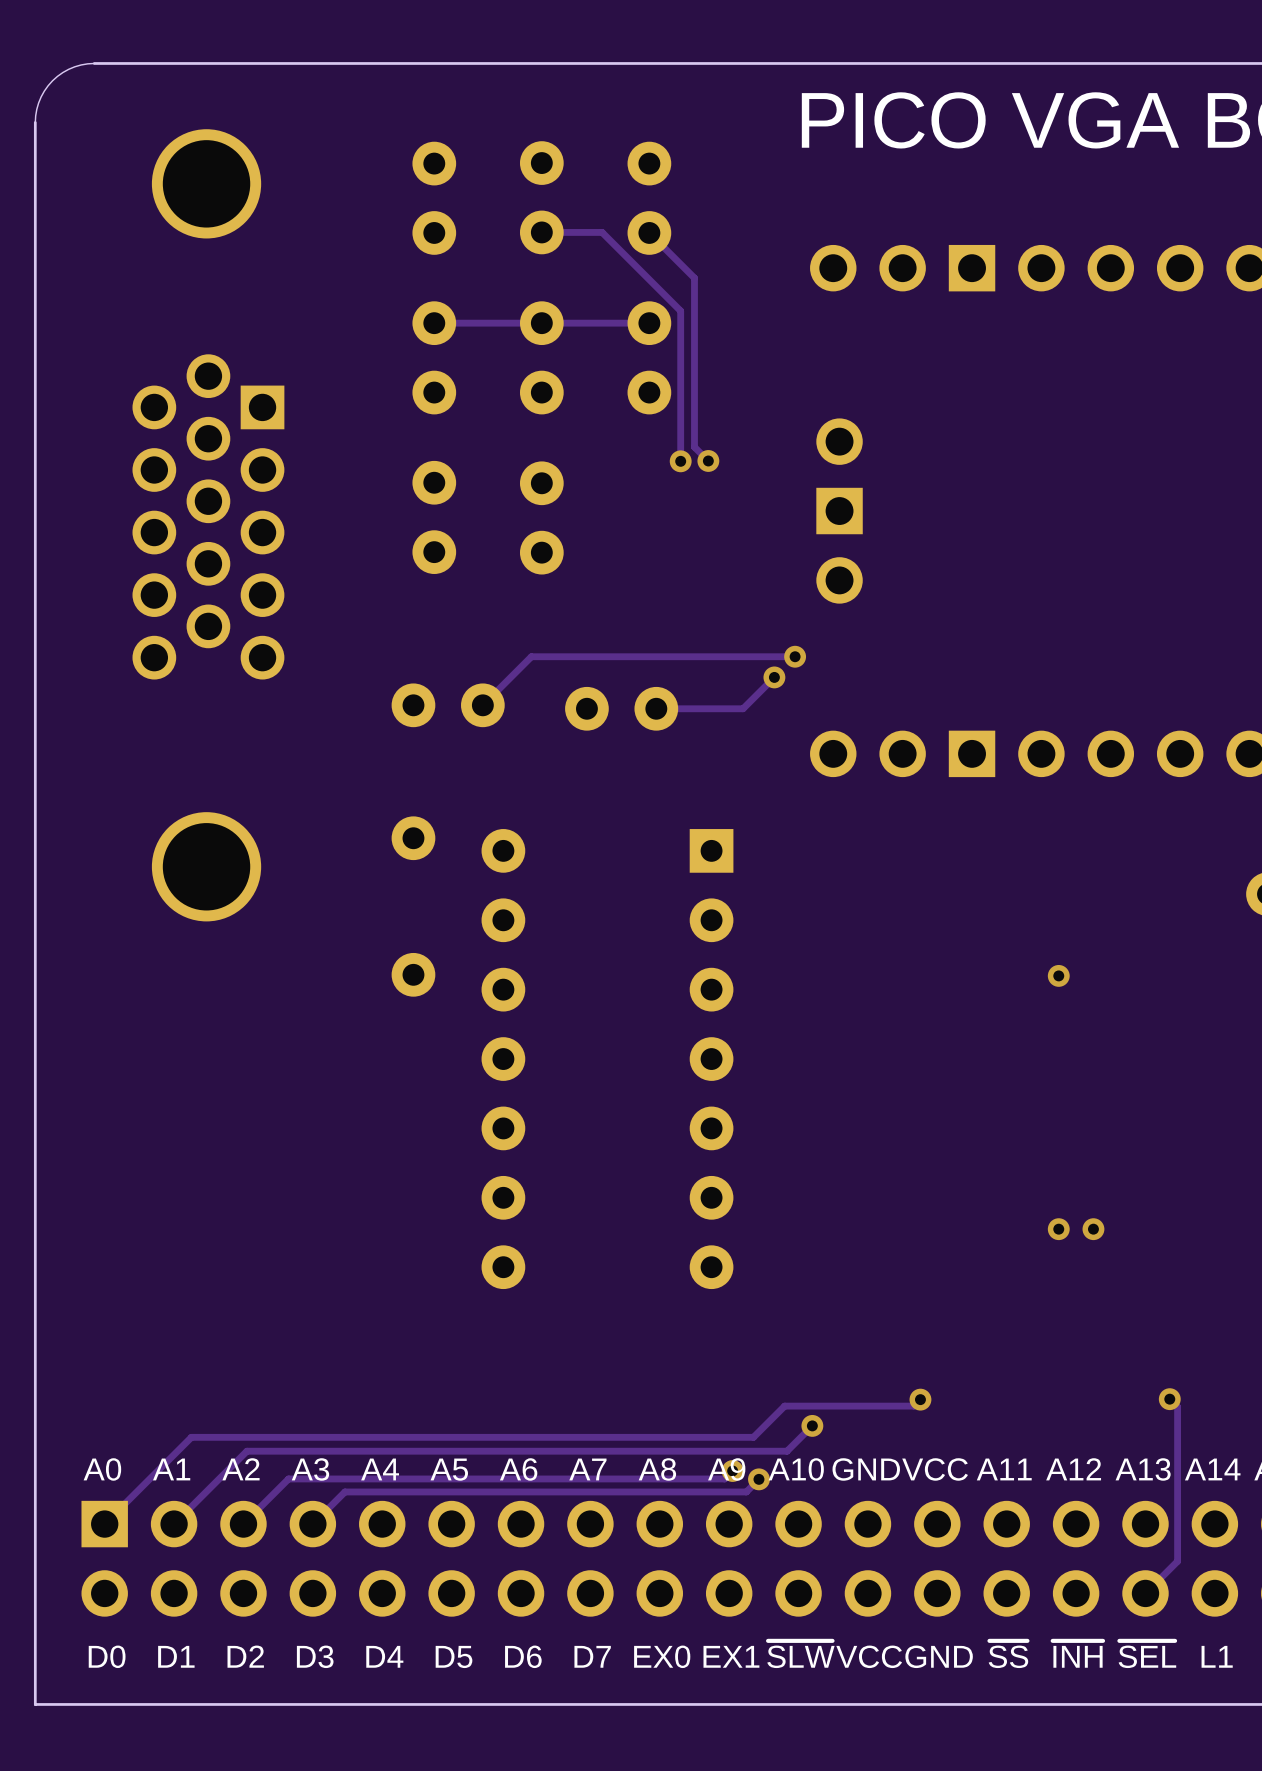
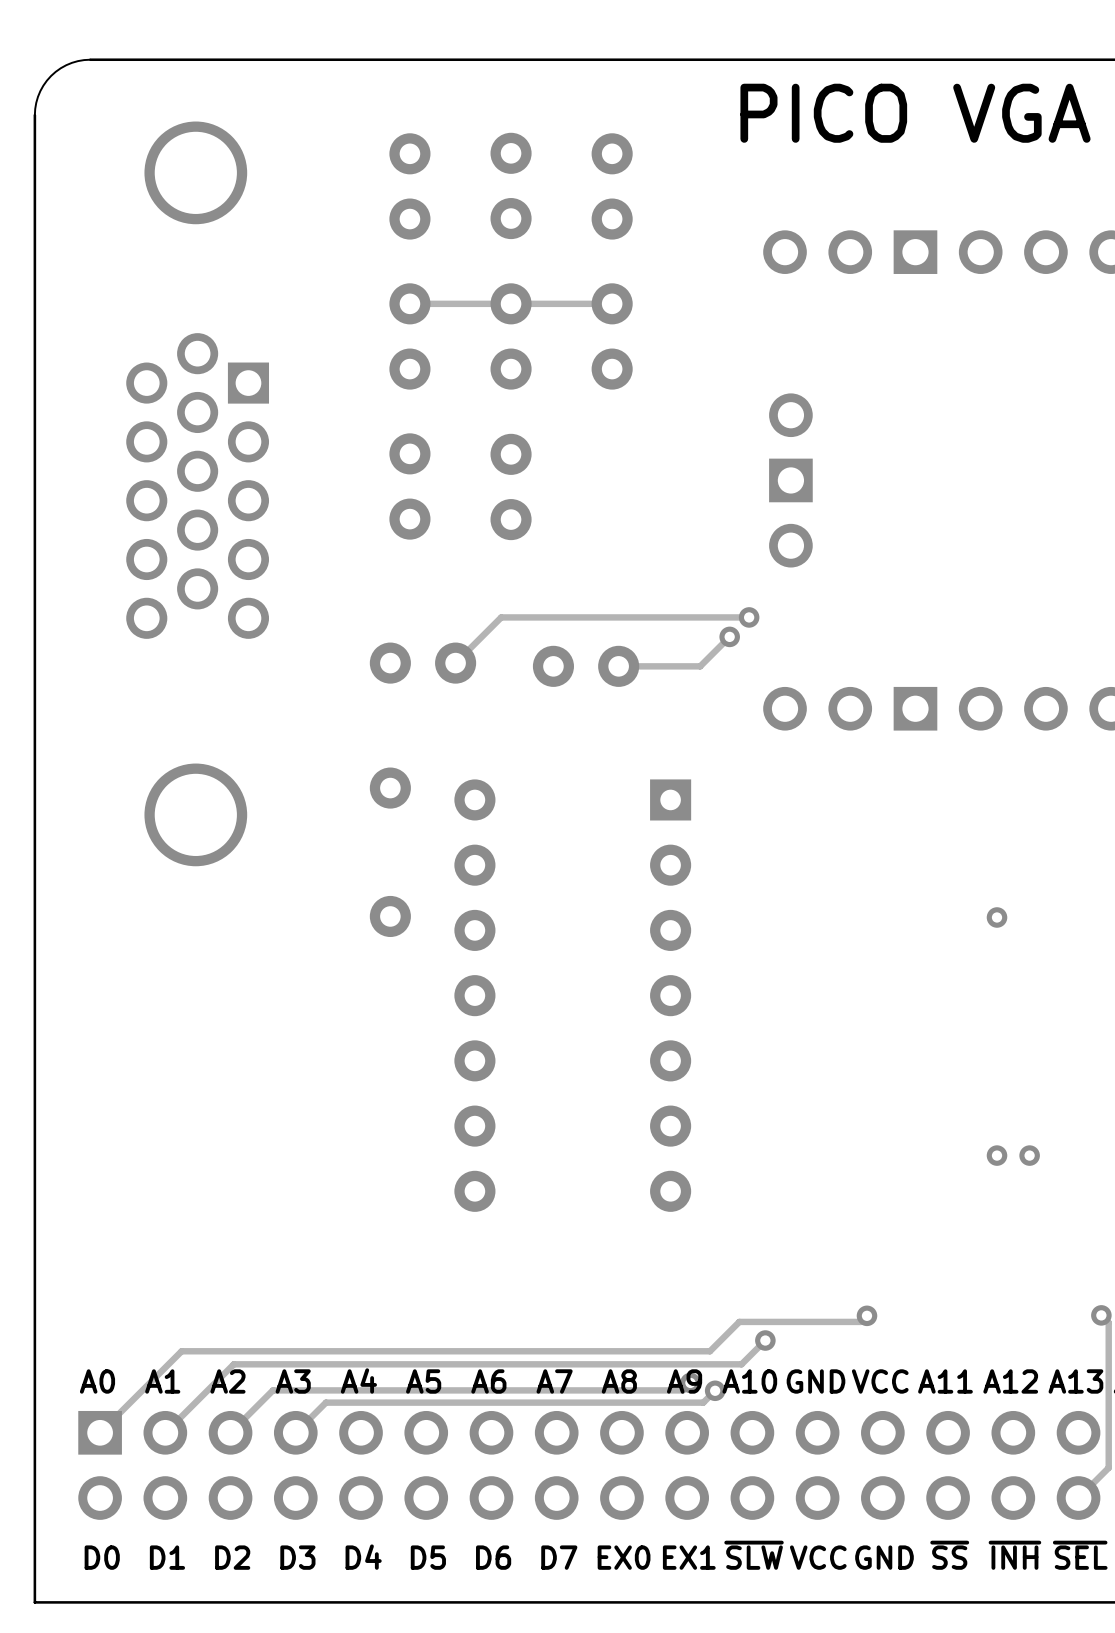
track: (541, 232) (602, 232) (680, 311) (680, 461) -> none
track: (649, 232) (694, 278) (694, 447) (708, 460) -> none
via: (708, 460) -> none
via: (680, 461) -> none

